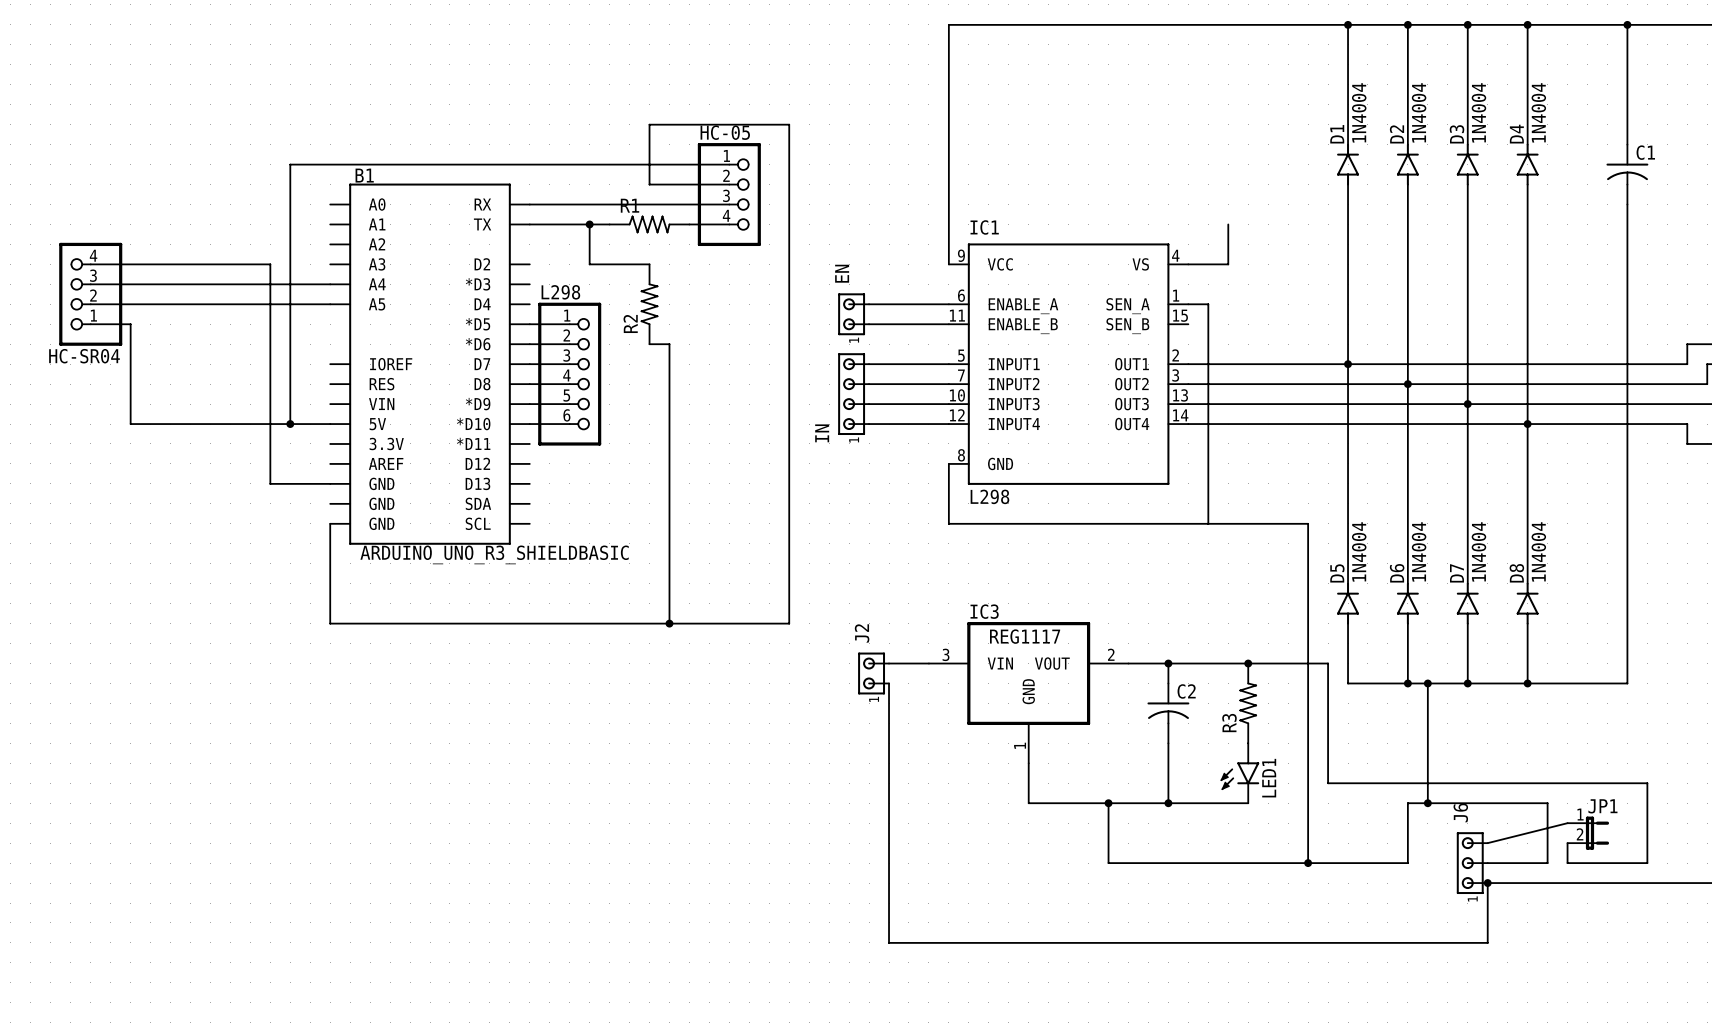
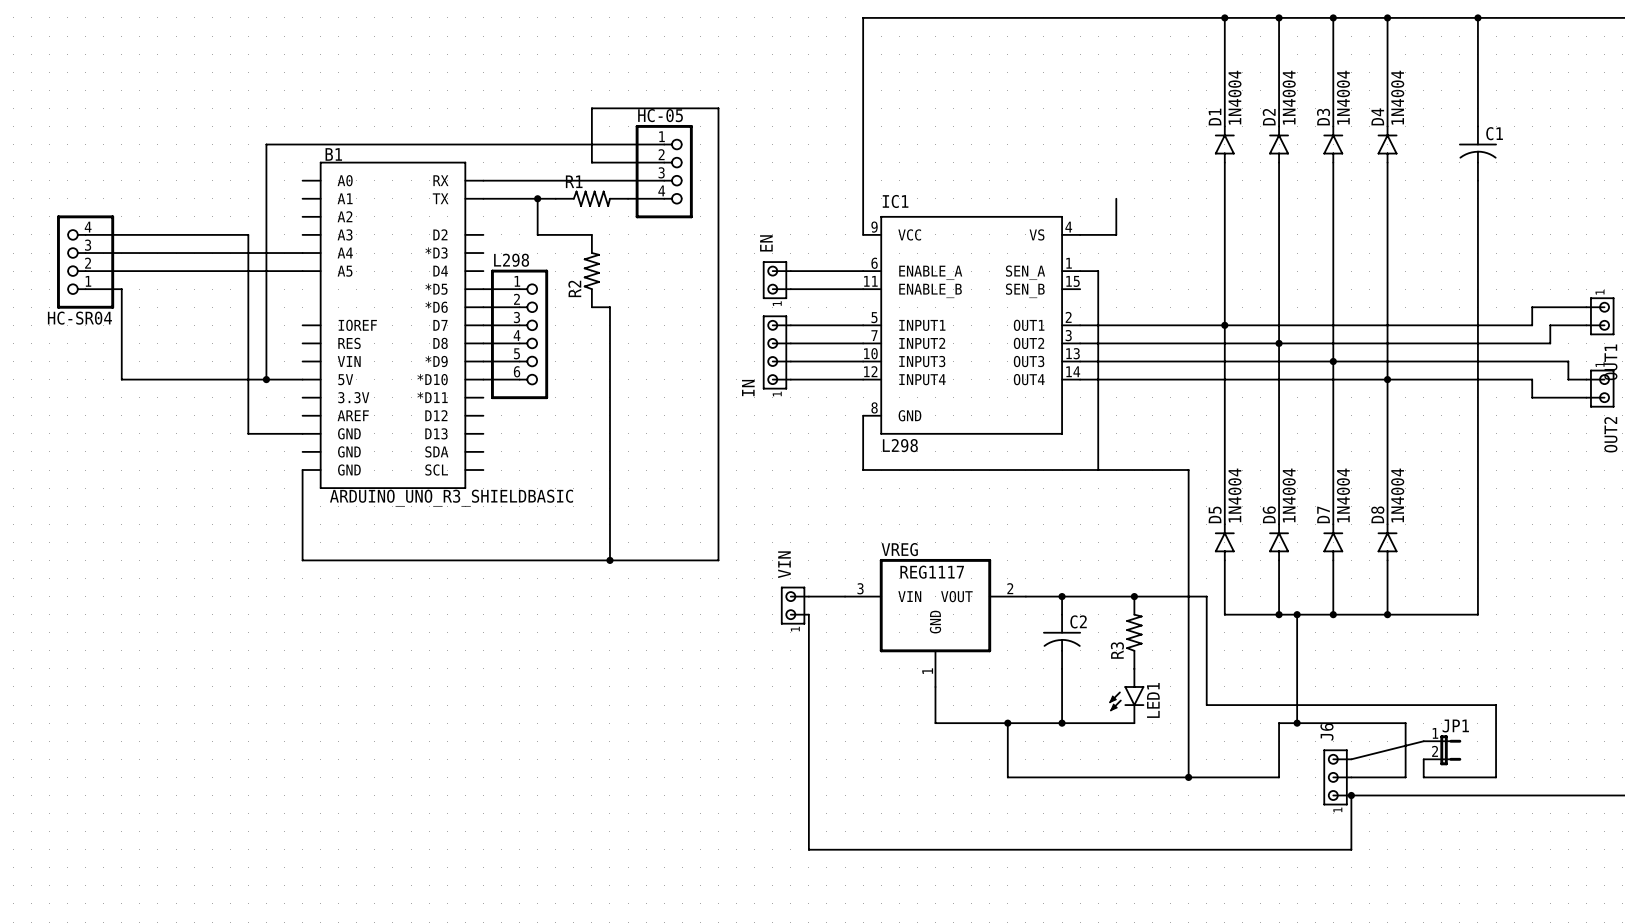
IC3 name: IC3 (984, 611) -> VREG (899, 549)
J2 name: J2 (862, 633) -> VIN (784, 564)

